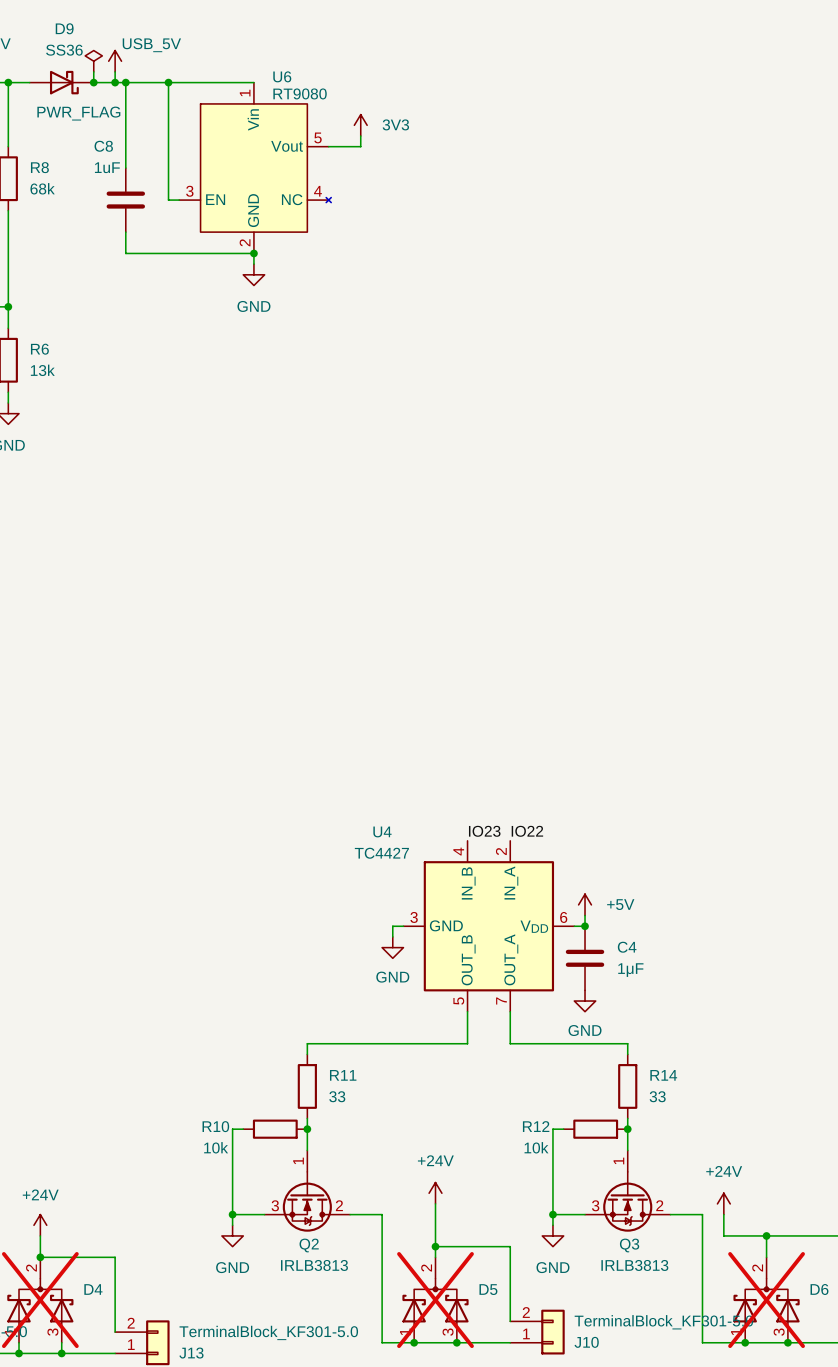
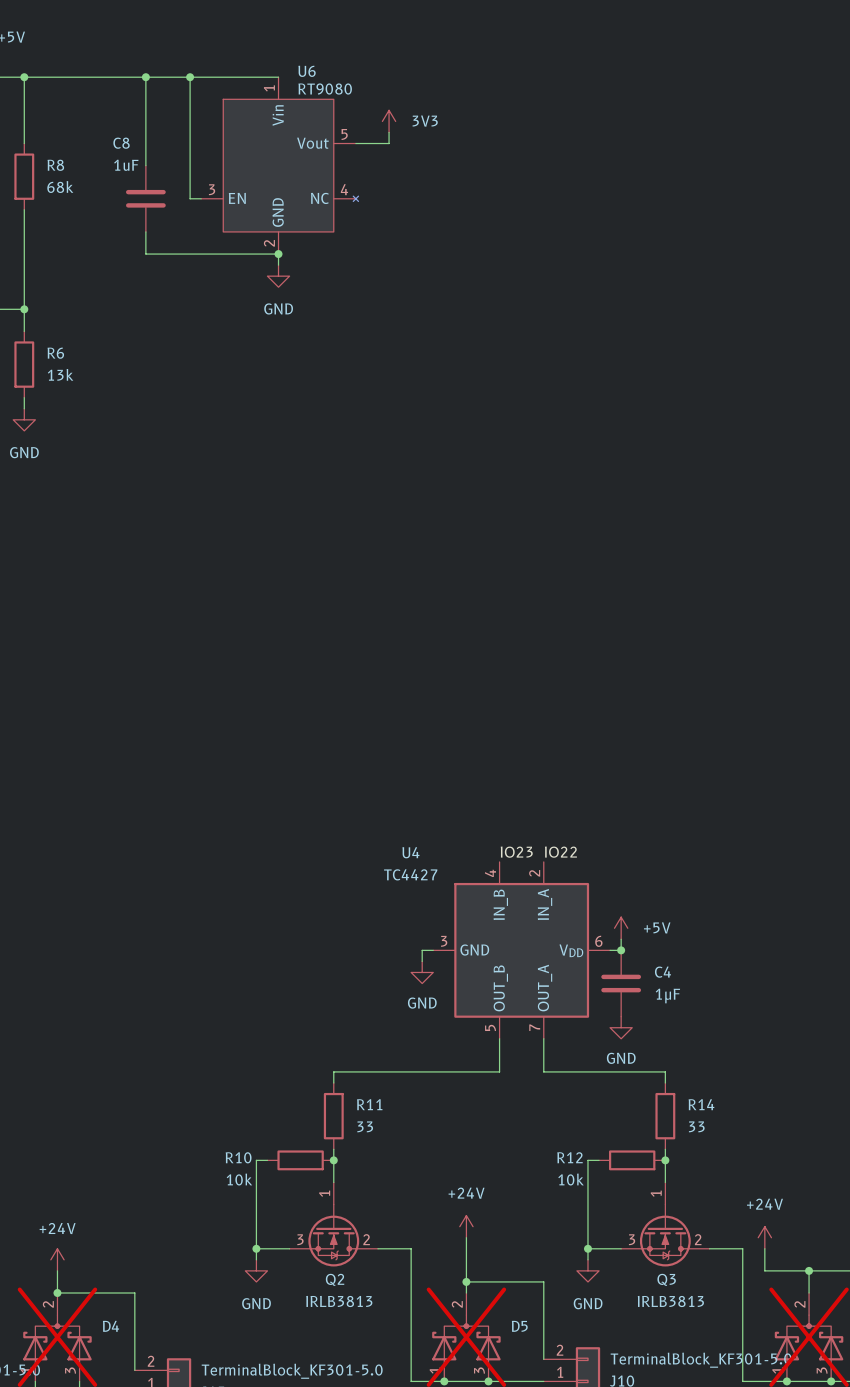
power symbol: PWR_FLAG (93, 61) -> none
power symbol: USB_5V (115, 61) -> none
wire: (115, 71) (115, 82) -> none
D9: SS36 (61, 82) -> none
junction: (93, 82) -> none
junction: (115, 82) -> none

